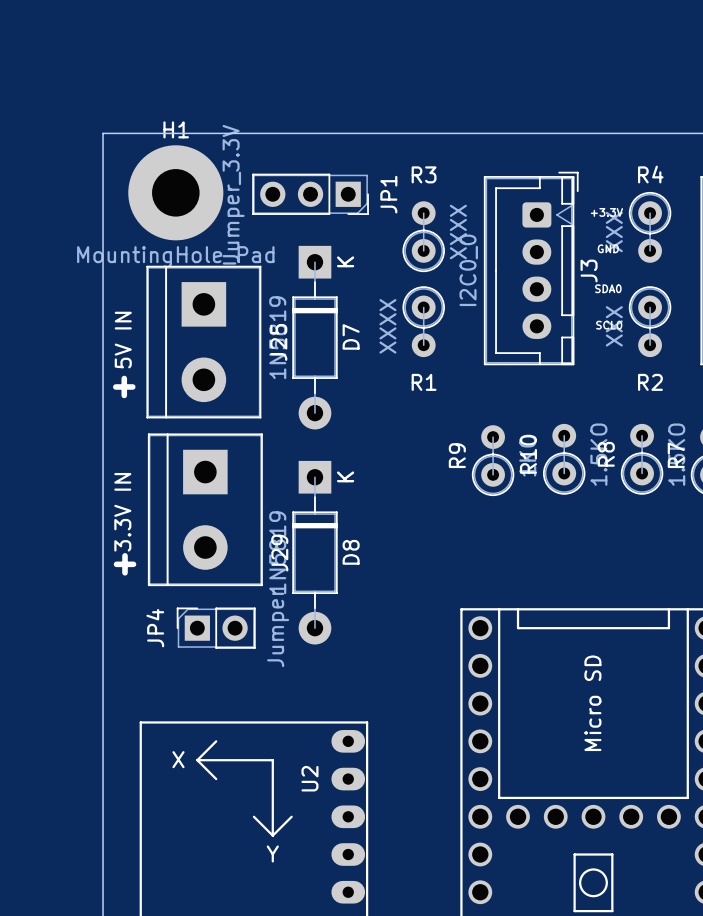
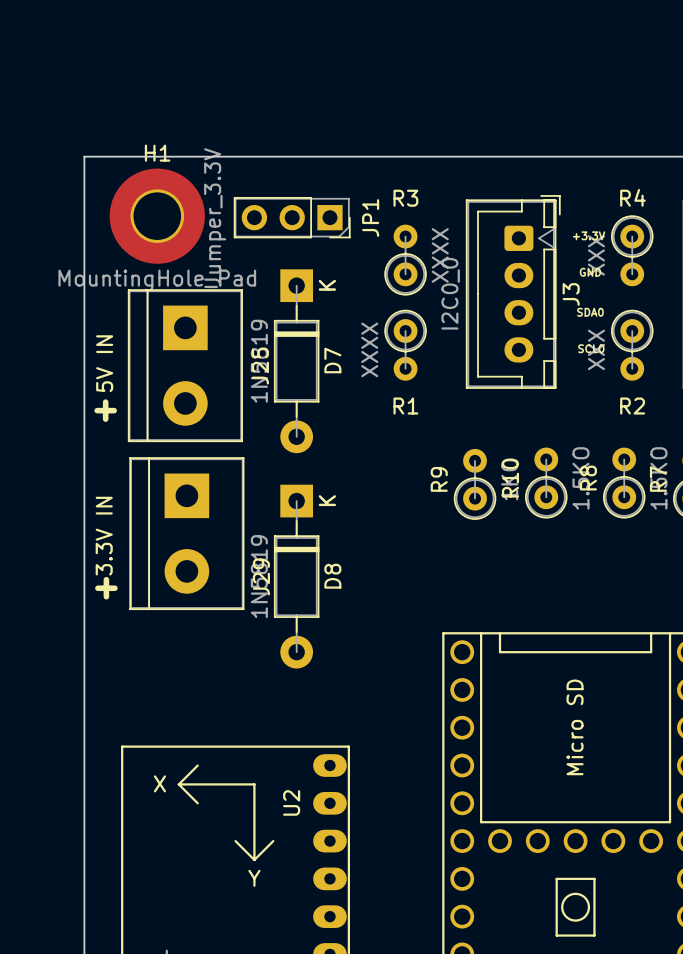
JP4: Jumper (216, 628) -> none

